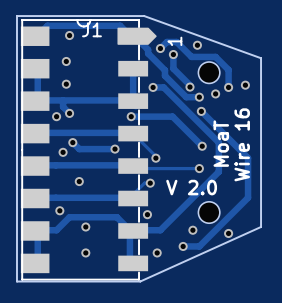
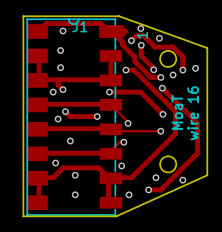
via: none -> (140, 28)
text: Wire 16 (242, 144) -> wire 16 (193, 113)
text: V 2.0 (191, 187) -> none

